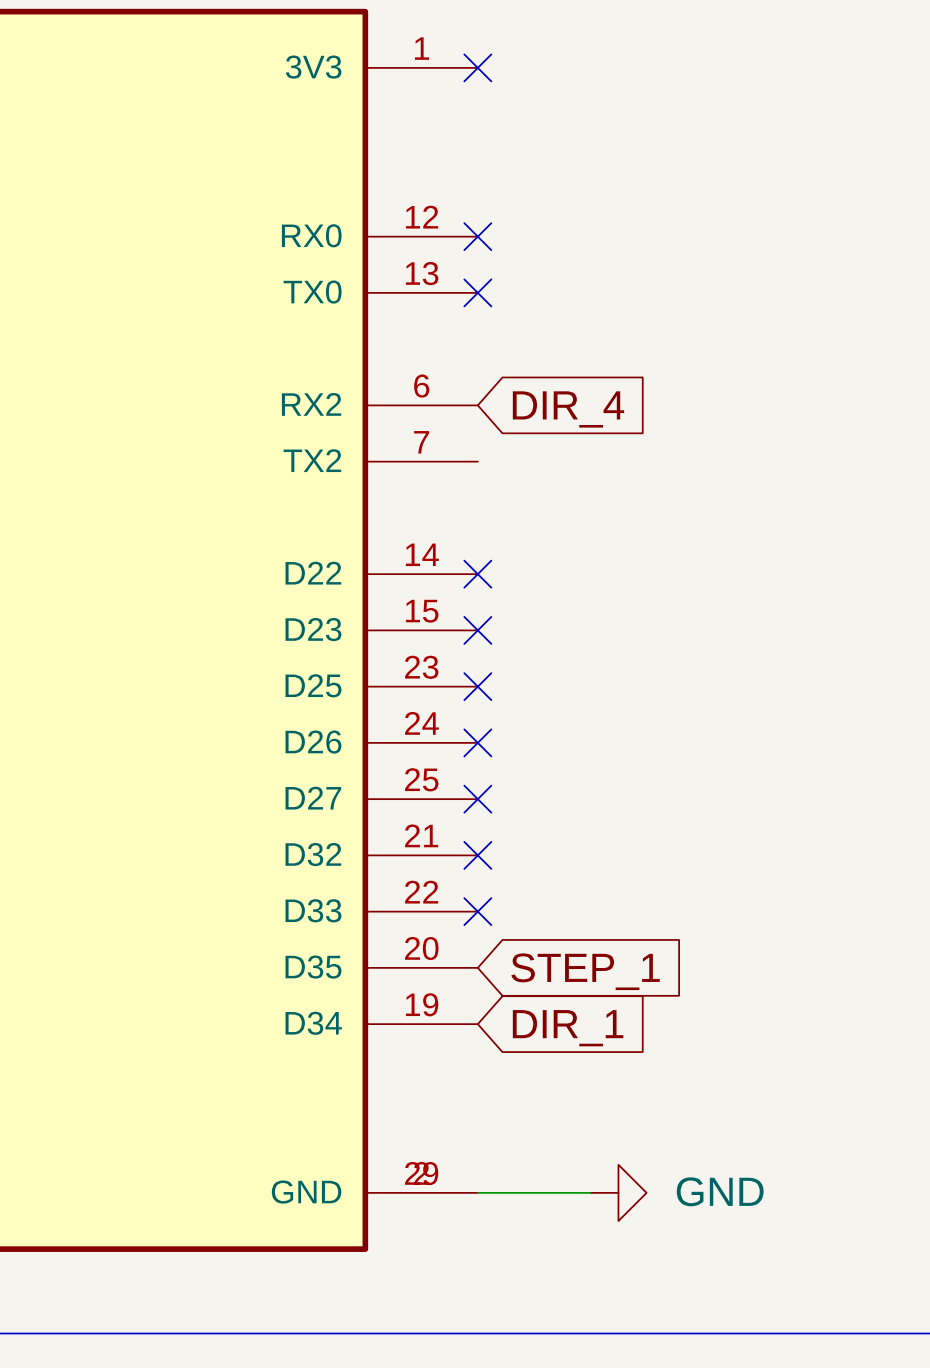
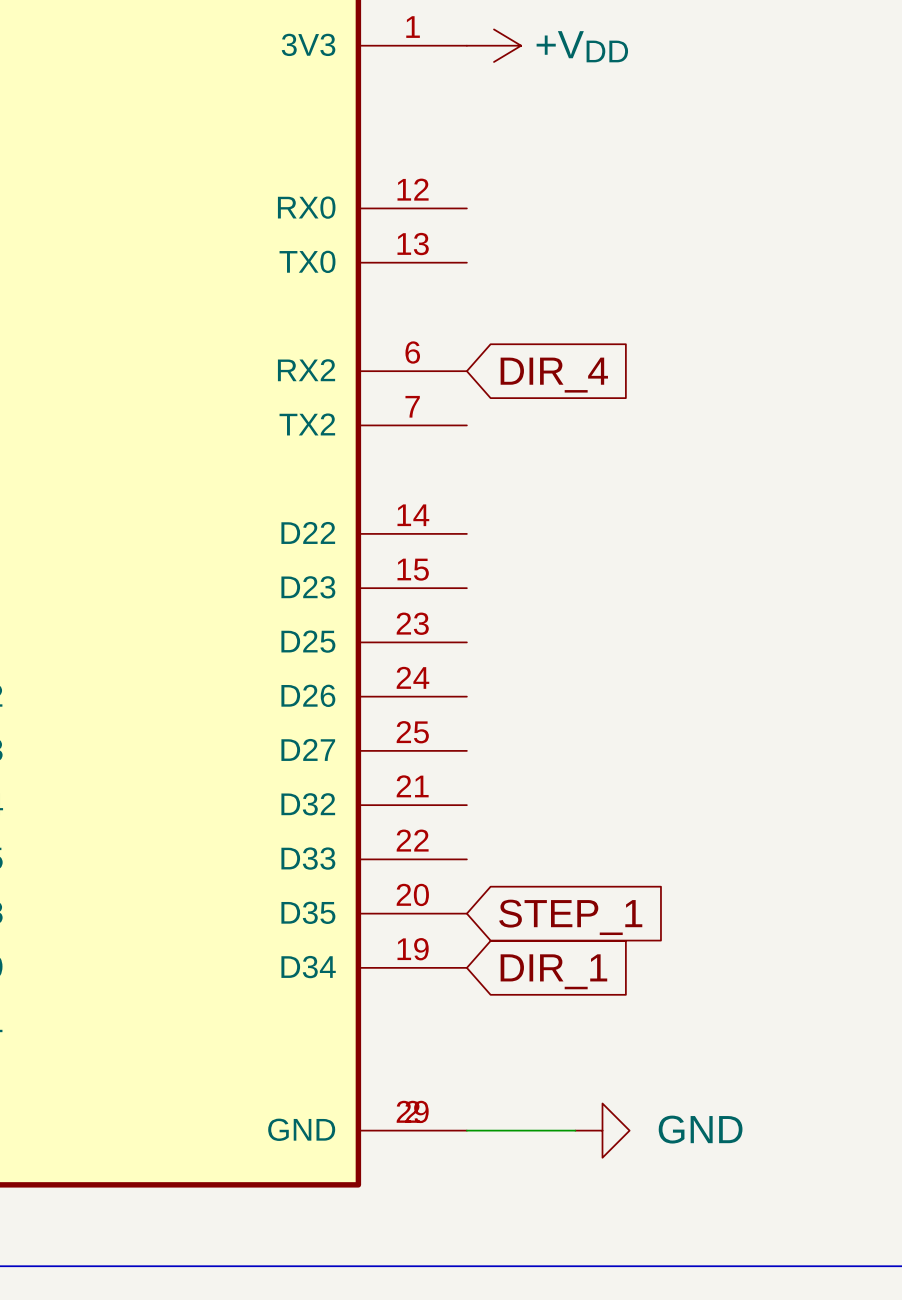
no-connect mark: (477, 67) -> none
power symbol: none -> +VDD (494, 45)
no-connect mark: (477, 236) -> none
no-connect mark: (477, 292) -> none
no-connect mark: (477, 574) -> none
no-connect mark: (477, 630) -> none
no-connect mark: (477, 686) -> none
no-connect mark: (477, 742) -> none
no-connect mark: (477, 799) -> none
no-connect mark: (477, 855) -> none
no-connect mark: (477, 911) -> none

